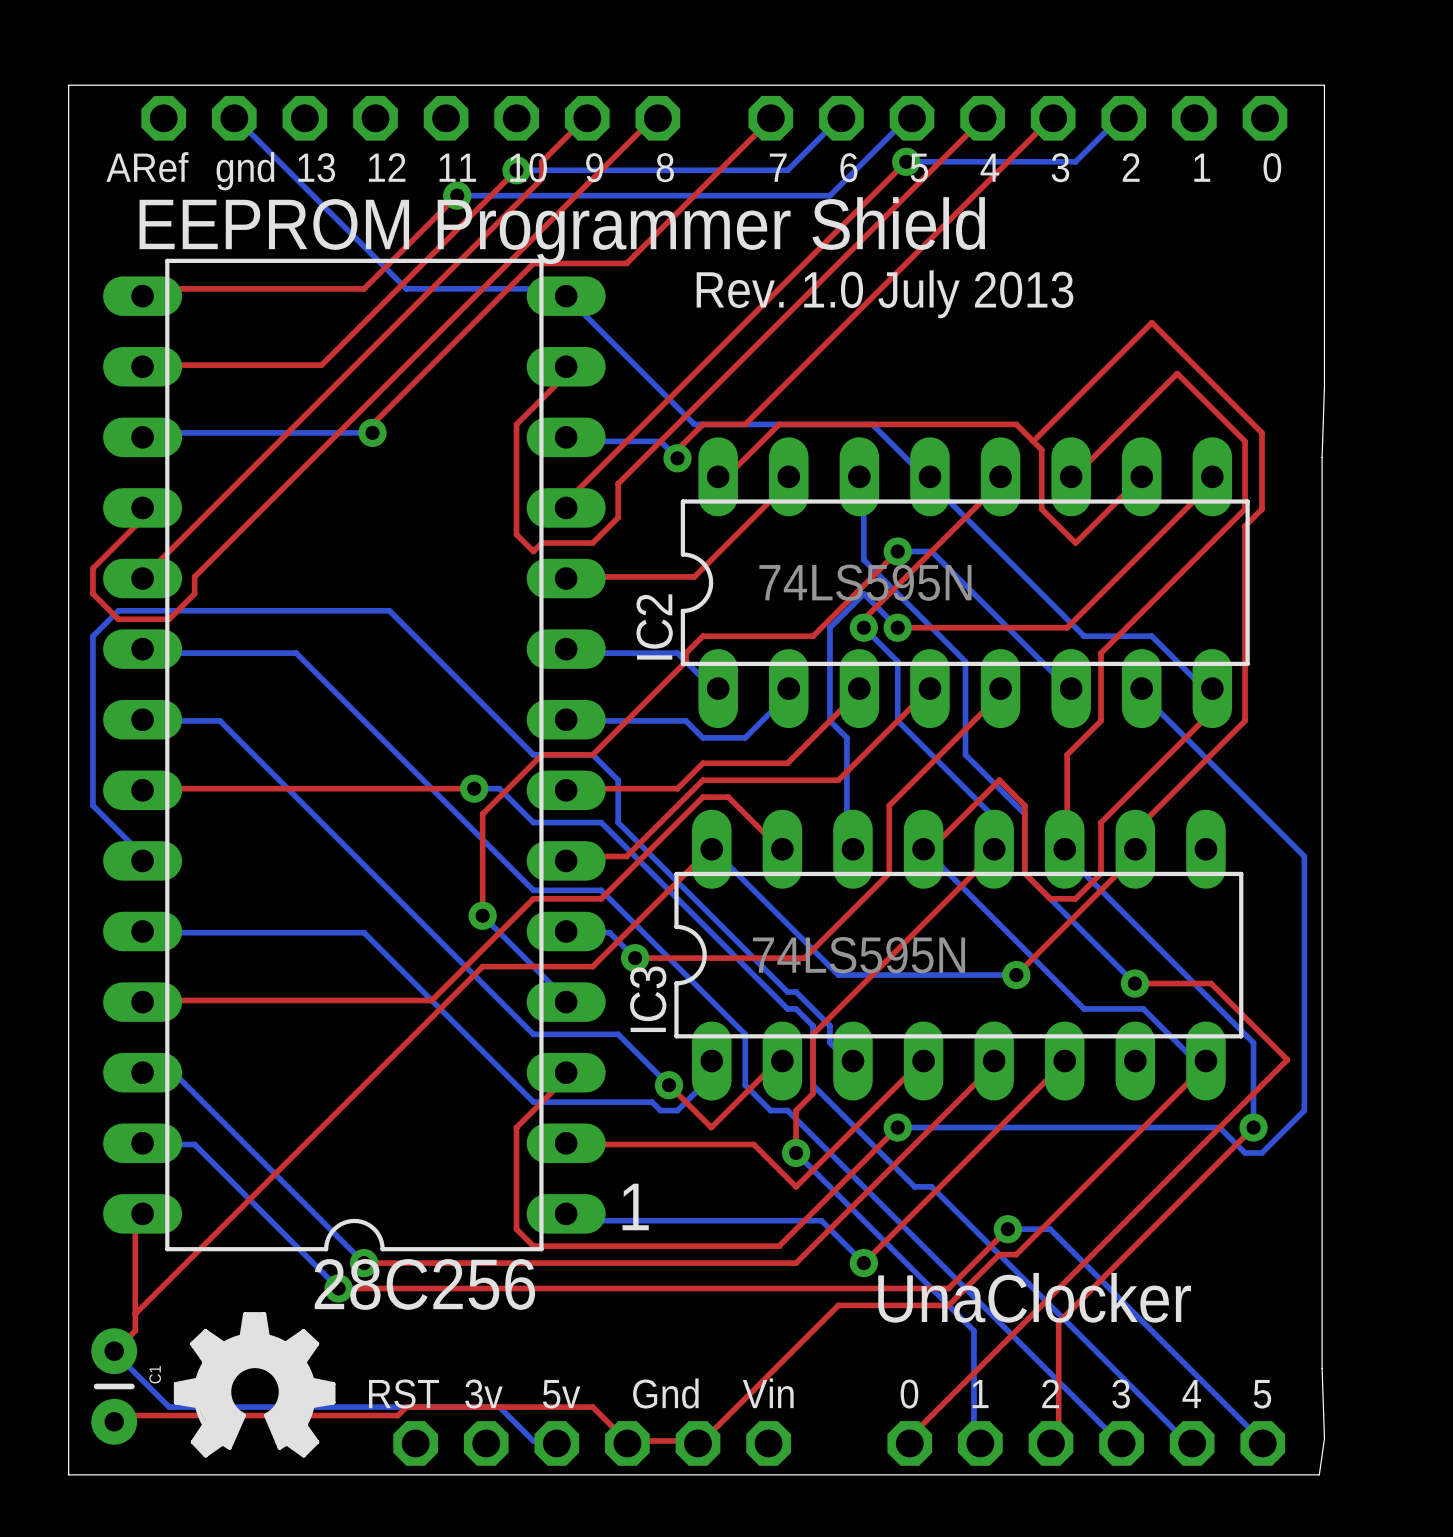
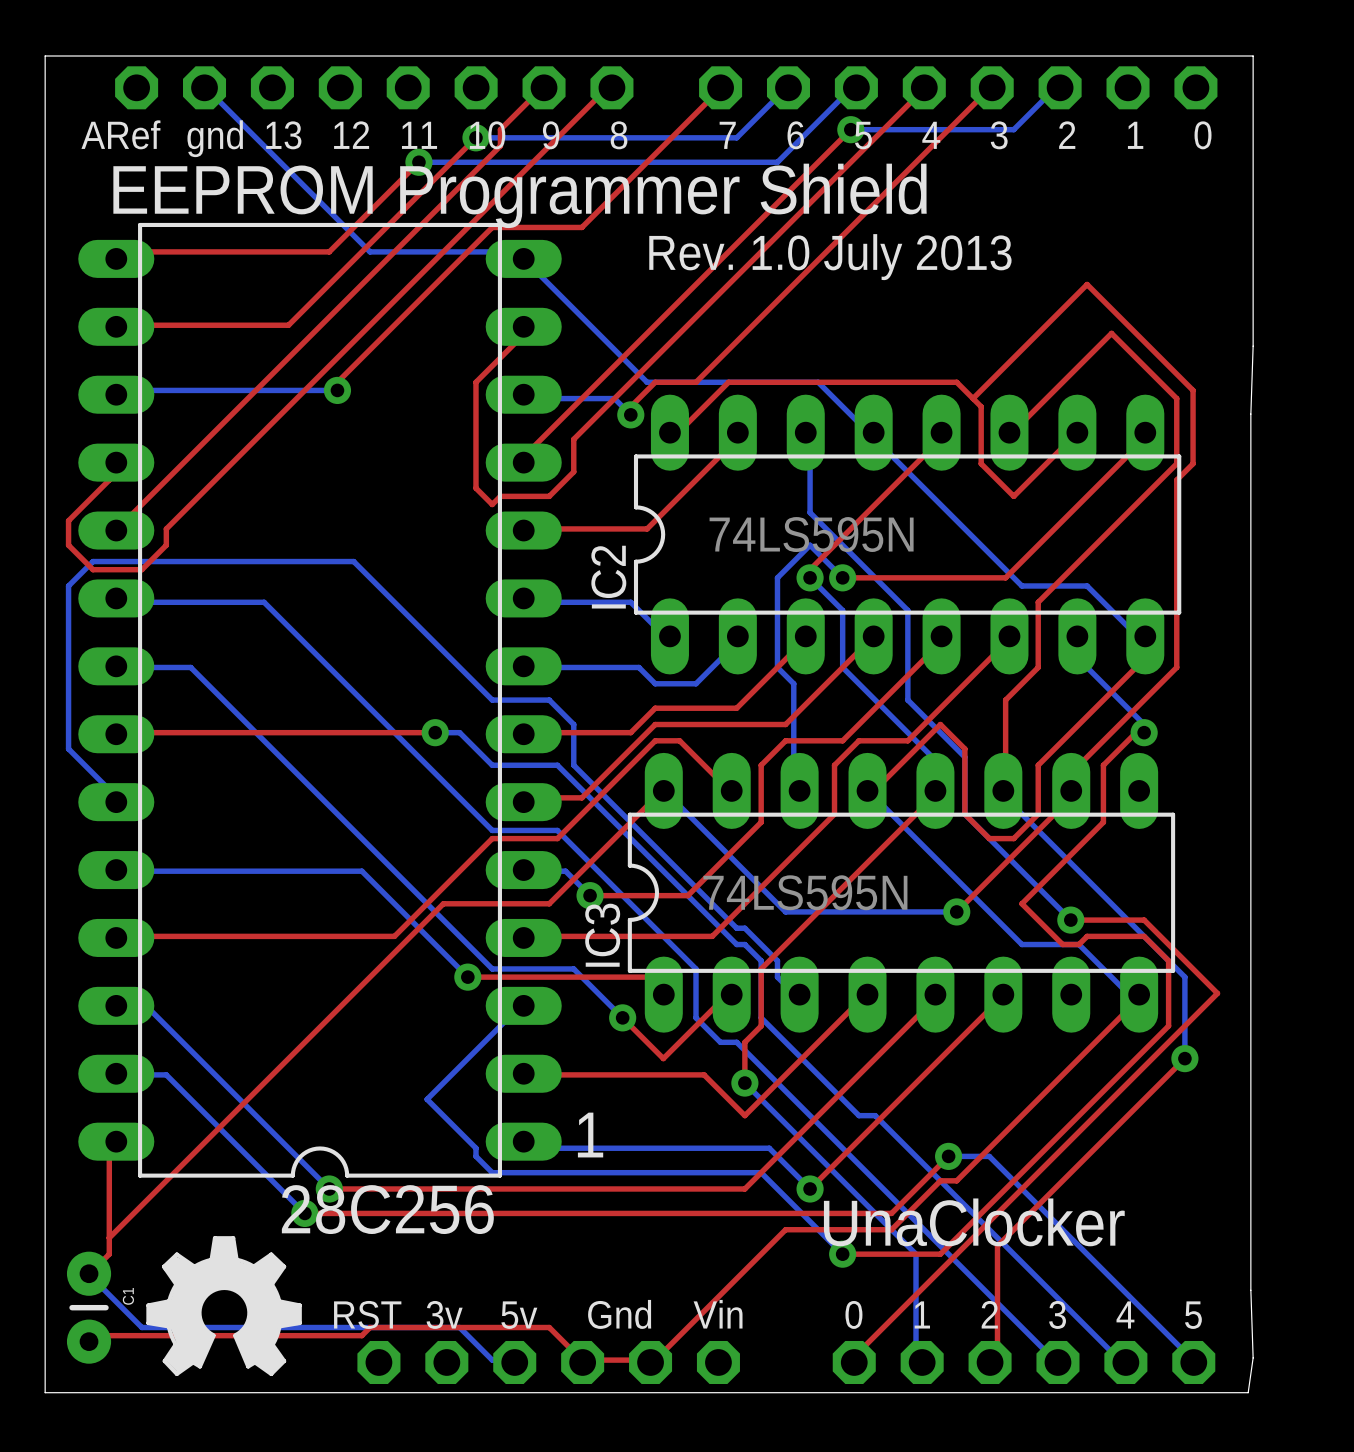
bottom track: (897, 551) (931, 551) (1067, 687) (1071, 688) -> none
top track: (897, 551) (813, 636) (702, 636) (685, 653) (685, 661) (592, 754) (541, 754) (482, 814) (482, 915) -> none
via: (897, 551) -> none
top track: none -> (1009, 636) (1005, 643) (907, 740) (858, 740) (834, 765)
bottom track: (1151, 703) (1304, 856) (1304, 1110) (1262, 1152) (1245, 1152) (1219, 1127) (897, 1127) -> (1087, 651) (1087, 667) (1144, 724) (1144, 732)
top track: none -> (1144, 732) (1136, 732) (1103, 765) (1103, 822) (1021, 903) (1062, 944) (1078, 944) (1087, 936) (1144, 936) (1168, 960) (1168, 1026) (940, 1254) (842, 1254)
via: none -> (1144, 732)
top track: (897, 797) (889, 805) (889, 822) -> (842, 740) (785, 740) (761, 765) (761, 822) (687, 895)
bottom track: (482, 915) (558, 991) (558, 1000) (566, 1002) -> none
via position: (482, 915) -> (467, 977)
bottom track: (364, 932) (533, 1102) (652, 1102) (660, 1110) (677, 1110) (719, 1068) (711, 1061) -> (329, 871) (361, 871) (467, 977)
top track: (736, 958) (804, 958) -> (523, 937) (524, 936) (712, 936) (753, 895)
top track: none -> (467, 977) (647, 977) (663, 994)
bottom track: none -> (523, 1005) (516, 1009) (427, 1099) (475, 1148) (475, 1156) (492, 1172) (761, 1172) (842, 1254)
top track: (566, 1072) (558, 1076) (558, 1085) (516, 1127) (516, 1229) (533, 1246) (779, 1246) (897, 1127) -> none
via: (897, 1127) -> none
via: none -> (842, 1254)

